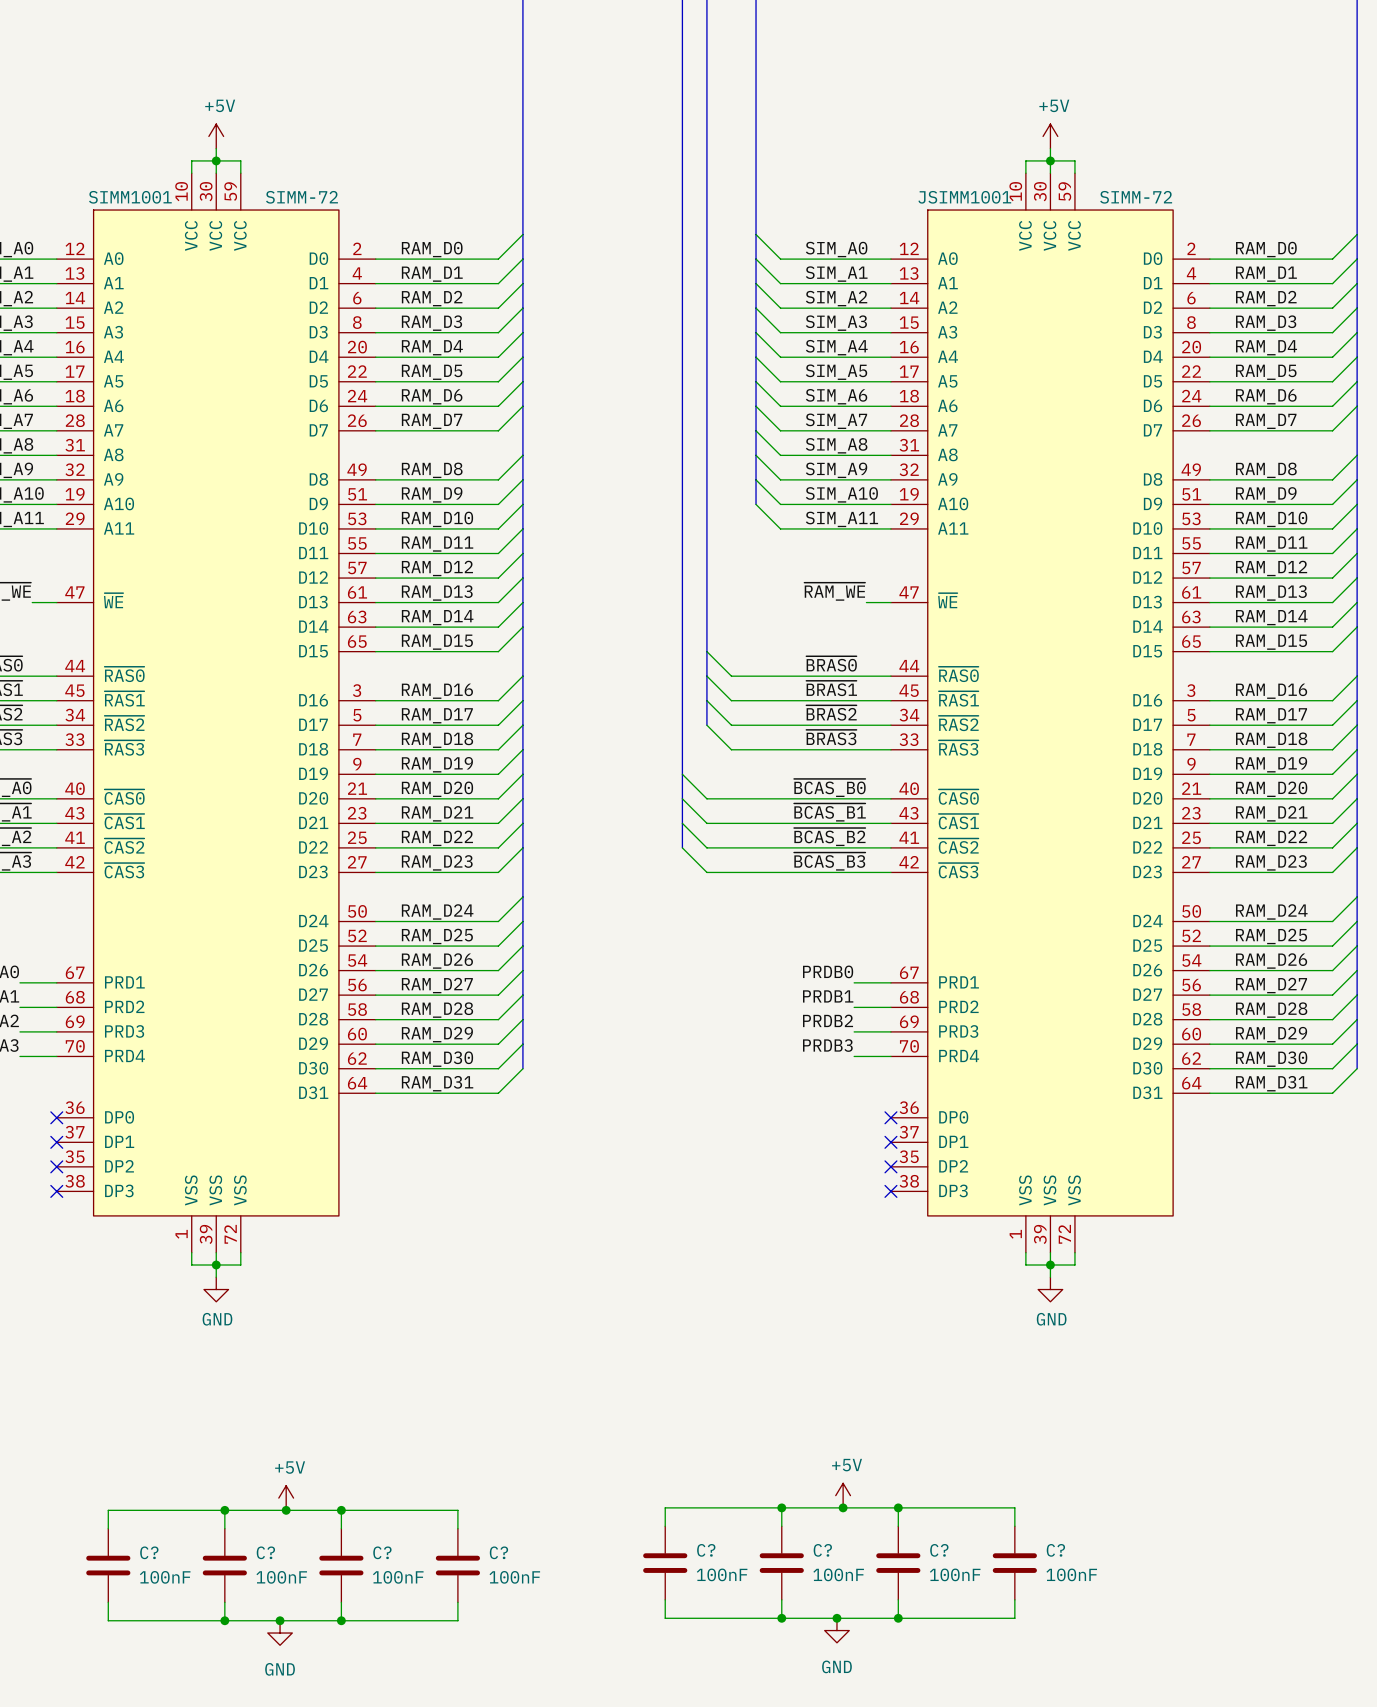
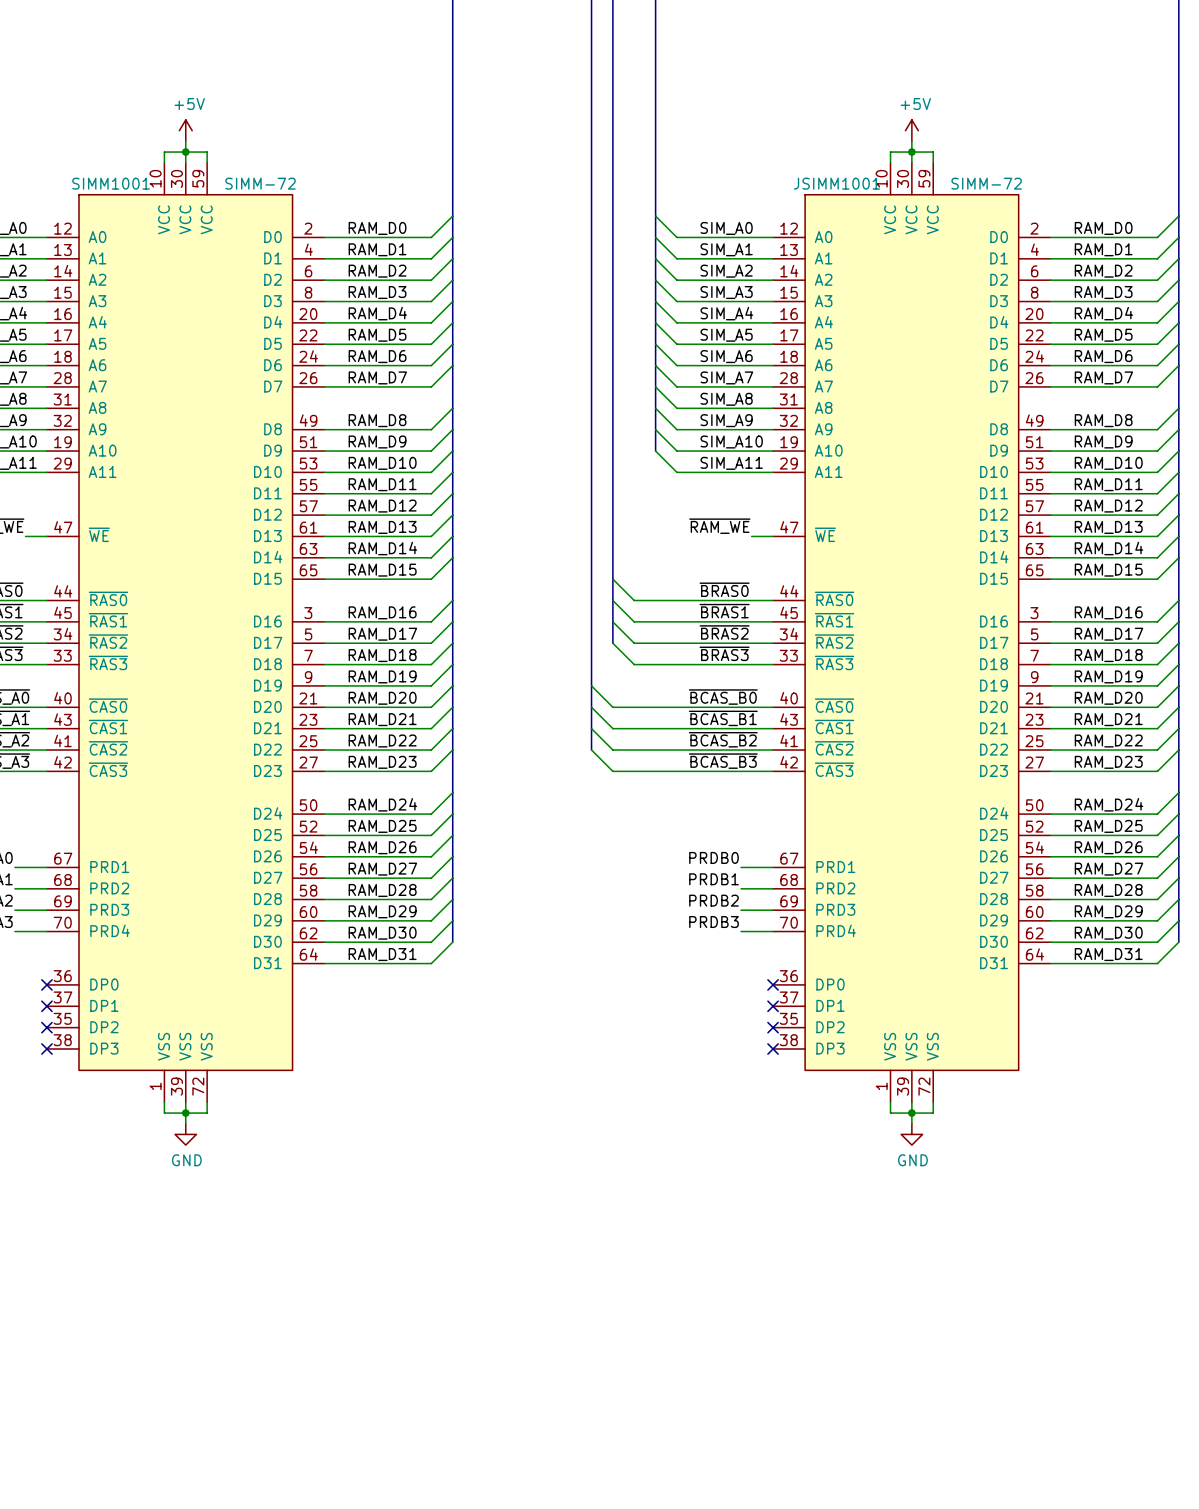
power symbol: +5V (843, 1495) -> none
power symbol: +5V (286, 1498) -> none
wire: (781, 1507) (781, 1526) -> none
junction: (781, 1507) -> none
junction: (843, 1507) -> none
wire: (898, 1507) (898, 1526) -> none
junction: (898, 1507) -> none
wire: (224, 1510) (224, 1528) -> none
junction: (224, 1510) -> none
junction: (286, 1510) -> none
wire: (341, 1510) (341, 1528) -> none
junction: (341, 1510) -> none
wire: (665, 1526) (665, 1507) (1014, 1507) (1014, 1526) -> none
wire: (108, 1528) (108, 1510) (457, 1510) (457, 1528) -> none
C?: 100nF (665, 1563) -> none
C?: 100nF (781, 1563) -> none
C?: 100nF (898, 1563) -> none
C?: 100nF (1014, 1563) -> none
C?: 100nF (108, 1565) -> none
C?: 100nF (224, 1565) -> none
C?: 100nF (341, 1565) -> none
C?: 100nF (457, 1565) -> none
wire: (665, 1599) (665, 1618) (1014, 1618) (1014, 1599) -> none
wire: (781, 1599) (781, 1618) -> none
wire: (898, 1599) (898, 1618) -> none
wire: (108, 1602) (108, 1620) (457, 1620) (457, 1602) -> none
wire: (224, 1602) (224, 1620) -> none
wire: (341, 1602) (341, 1620) -> none
junction: (781, 1618) -> none
junction: (836, 1618) -> none
junction: (898, 1618) -> none
junction: (224, 1620) -> none
junction: (280, 1620) -> none
junction: (341, 1620) -> none
power symbol: GND (836, 1630) -> none
power symbol: GND (280, 1633) -> none

